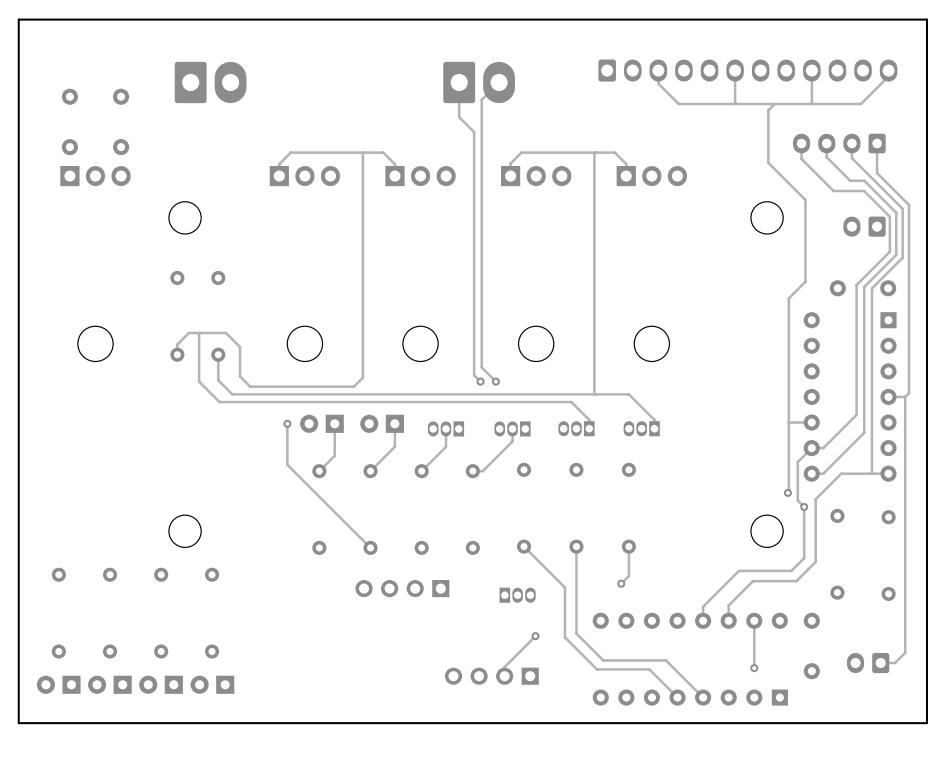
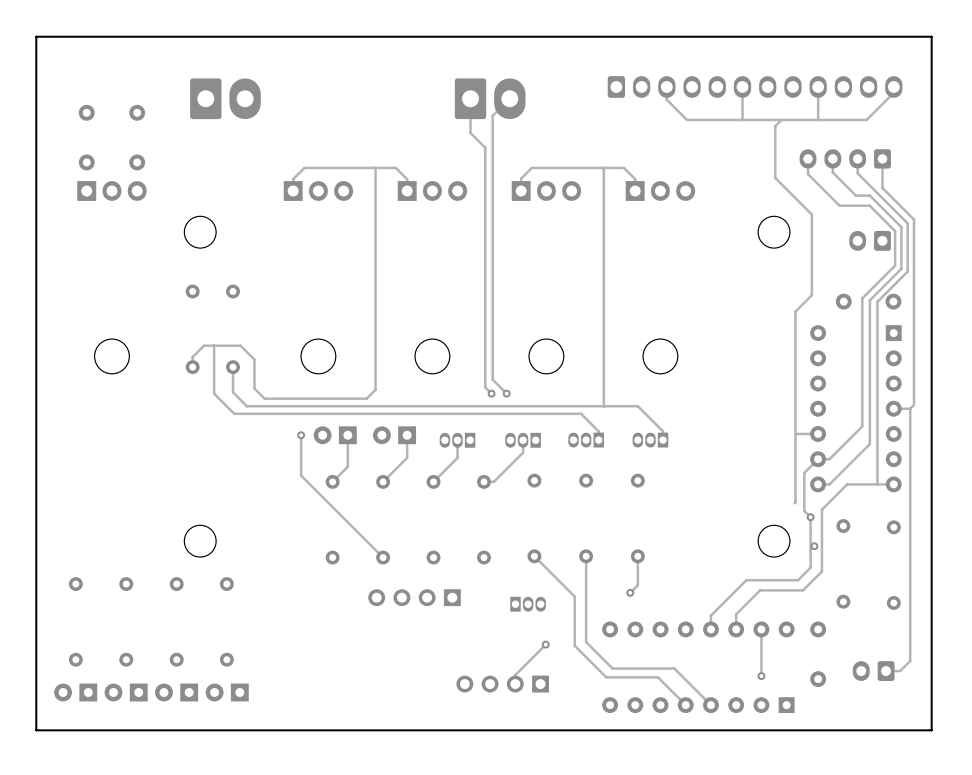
via position: (787, 492) -> (814, 546)

